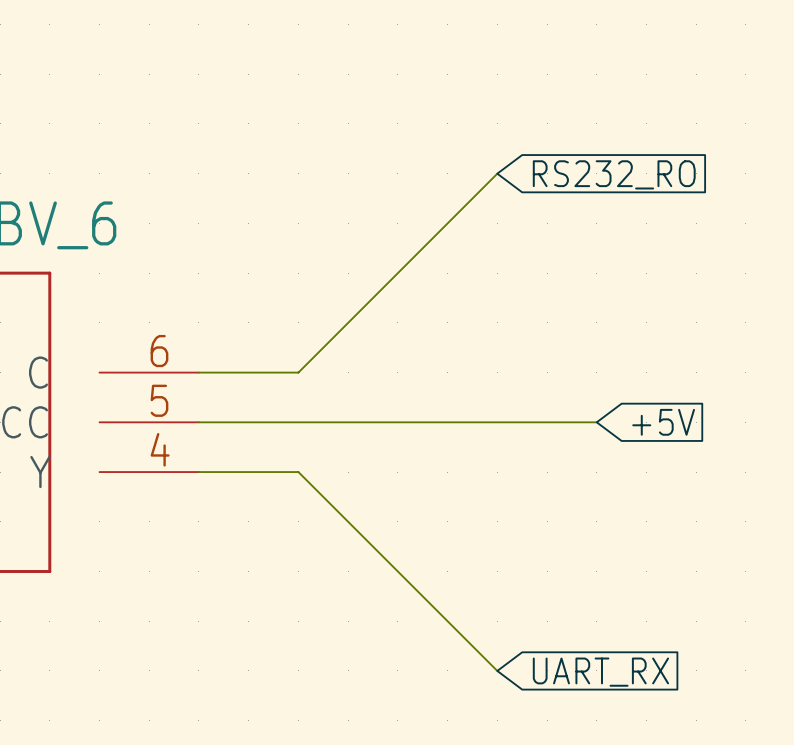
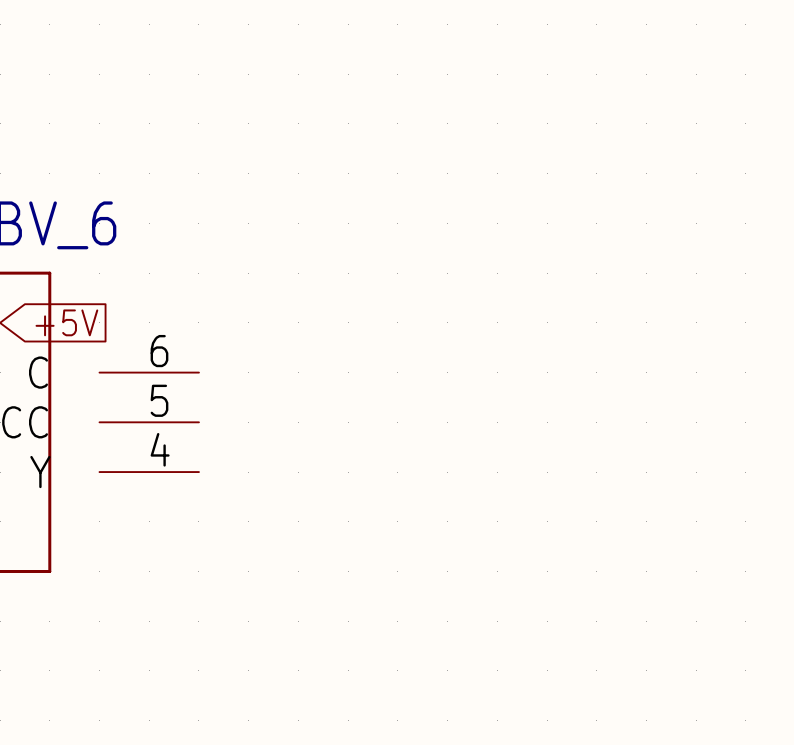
wire: (497, 173) (298, 372) (198, 372) -> none
global label: RS232_RO (614, 174) -> none
global label: none -> +5V (66, 322)
wire: (198, 422) (596, 422) -> none
global label: +5V (663, 422) -> none
wire: (198, 472) (298, 472) (497, 670) -> none
global label: UART_RX (600, 672) -> none

